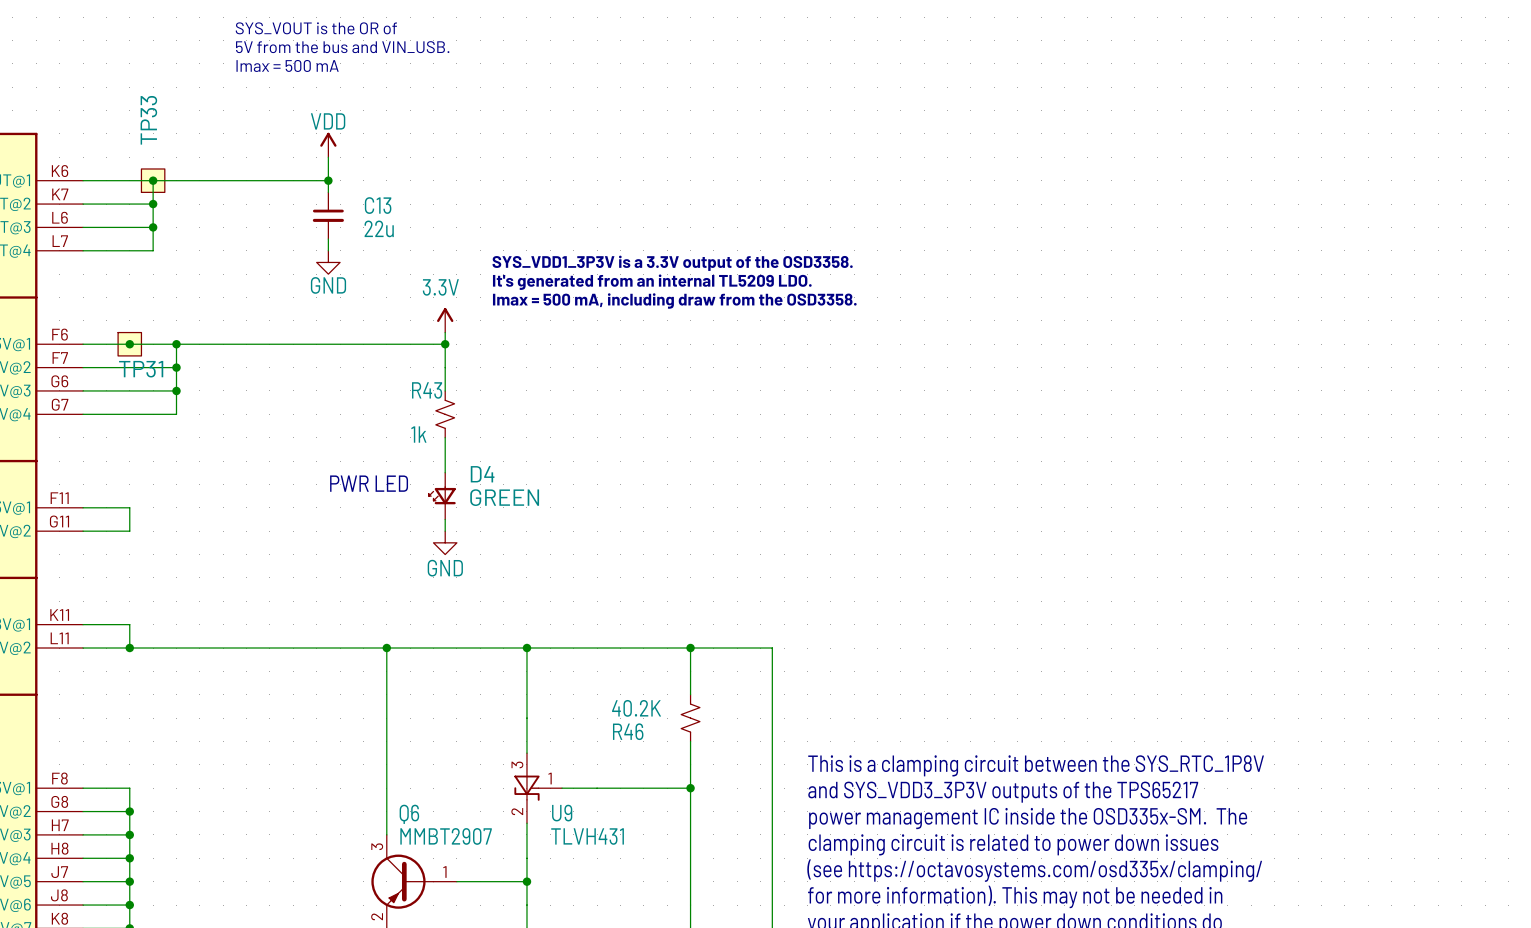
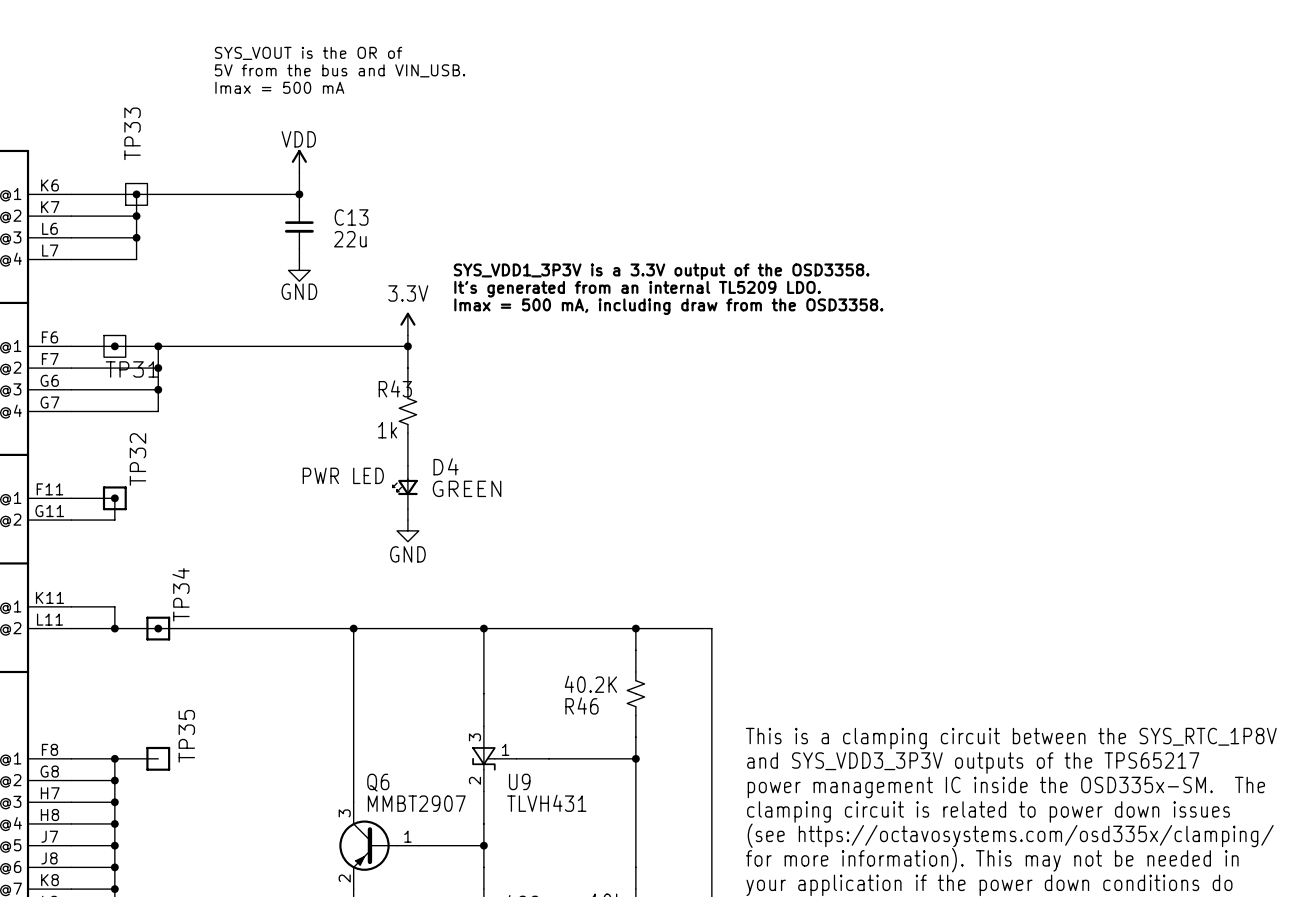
junction: none -> (114, 498)
TP32: none -> (114, 498)
junction: none -> (158, 628)
TP34: none -> (158, 628)
wire: none -> (114, 758) (158, 758)
junction: none -> (114, 758)
TP35: none -> (158, 758)

